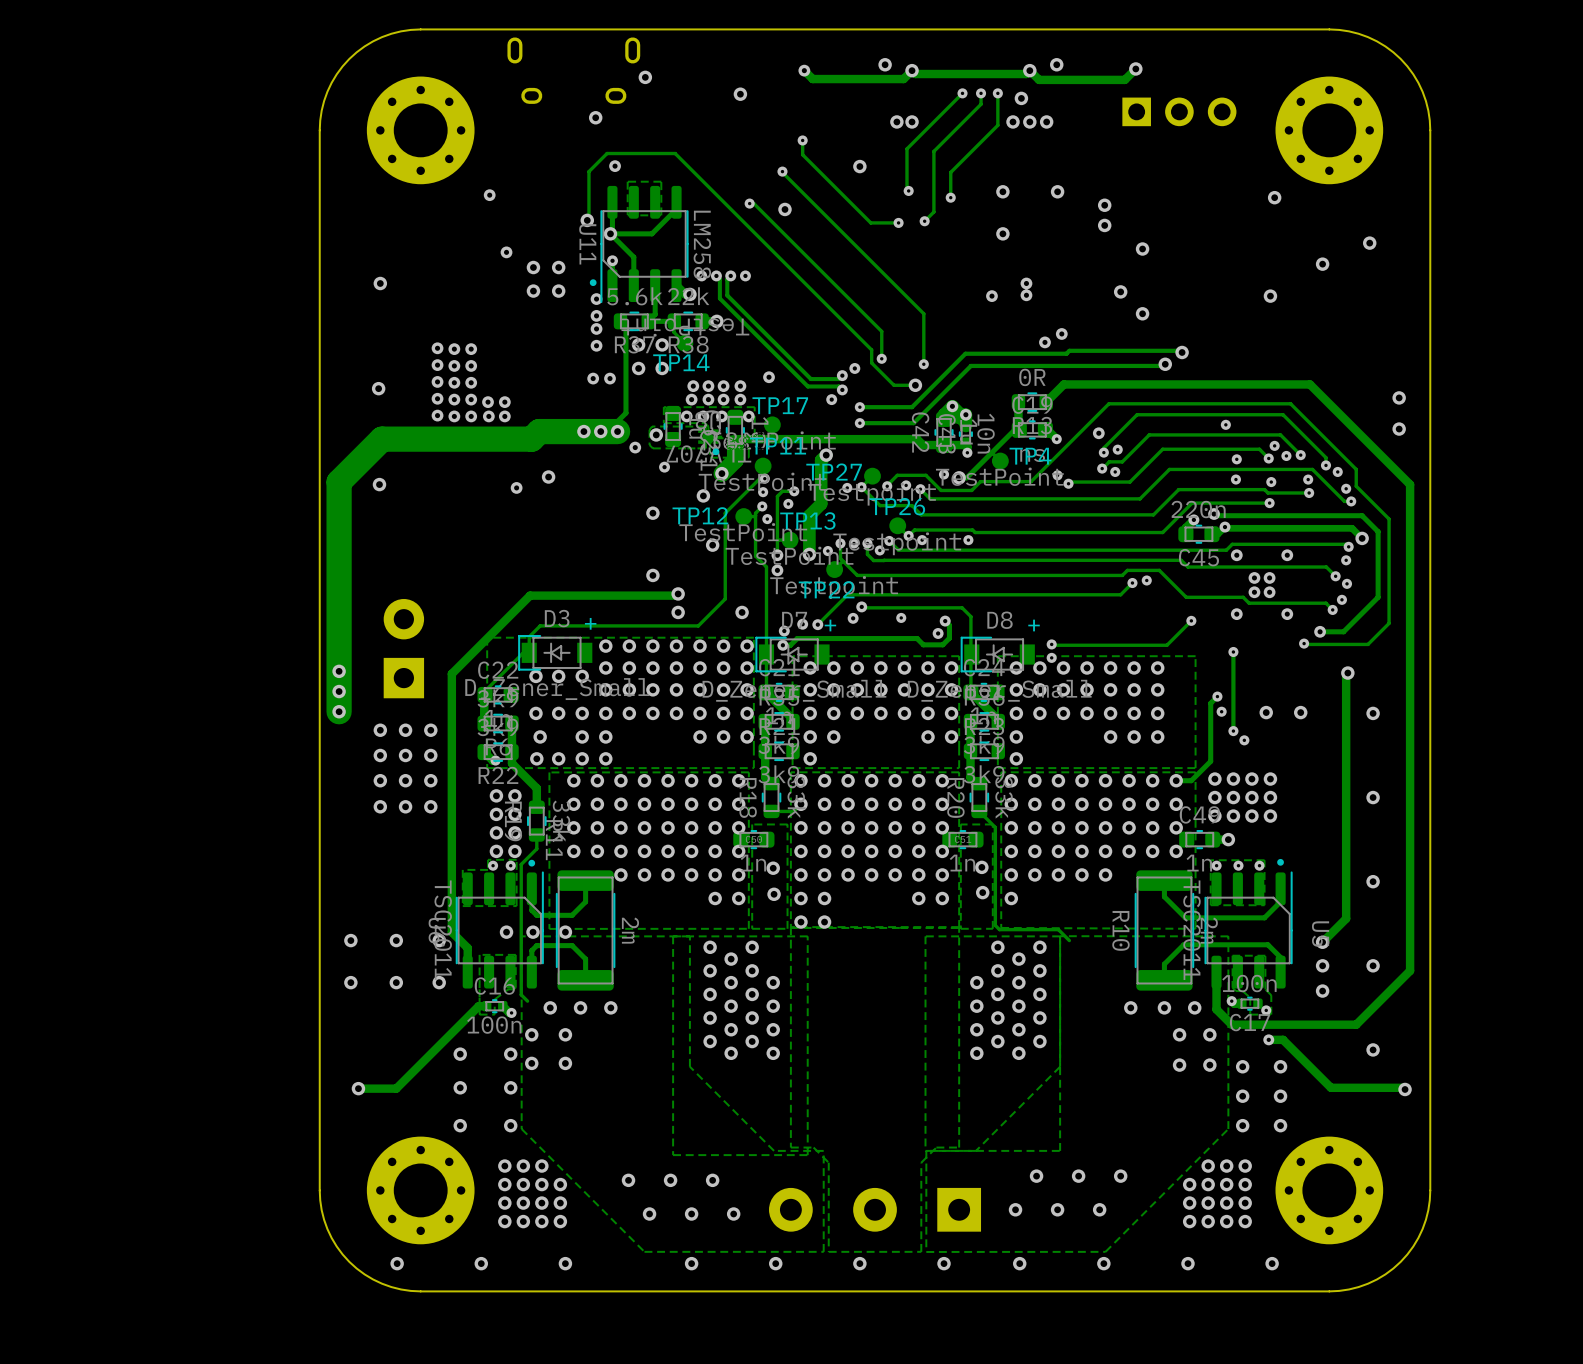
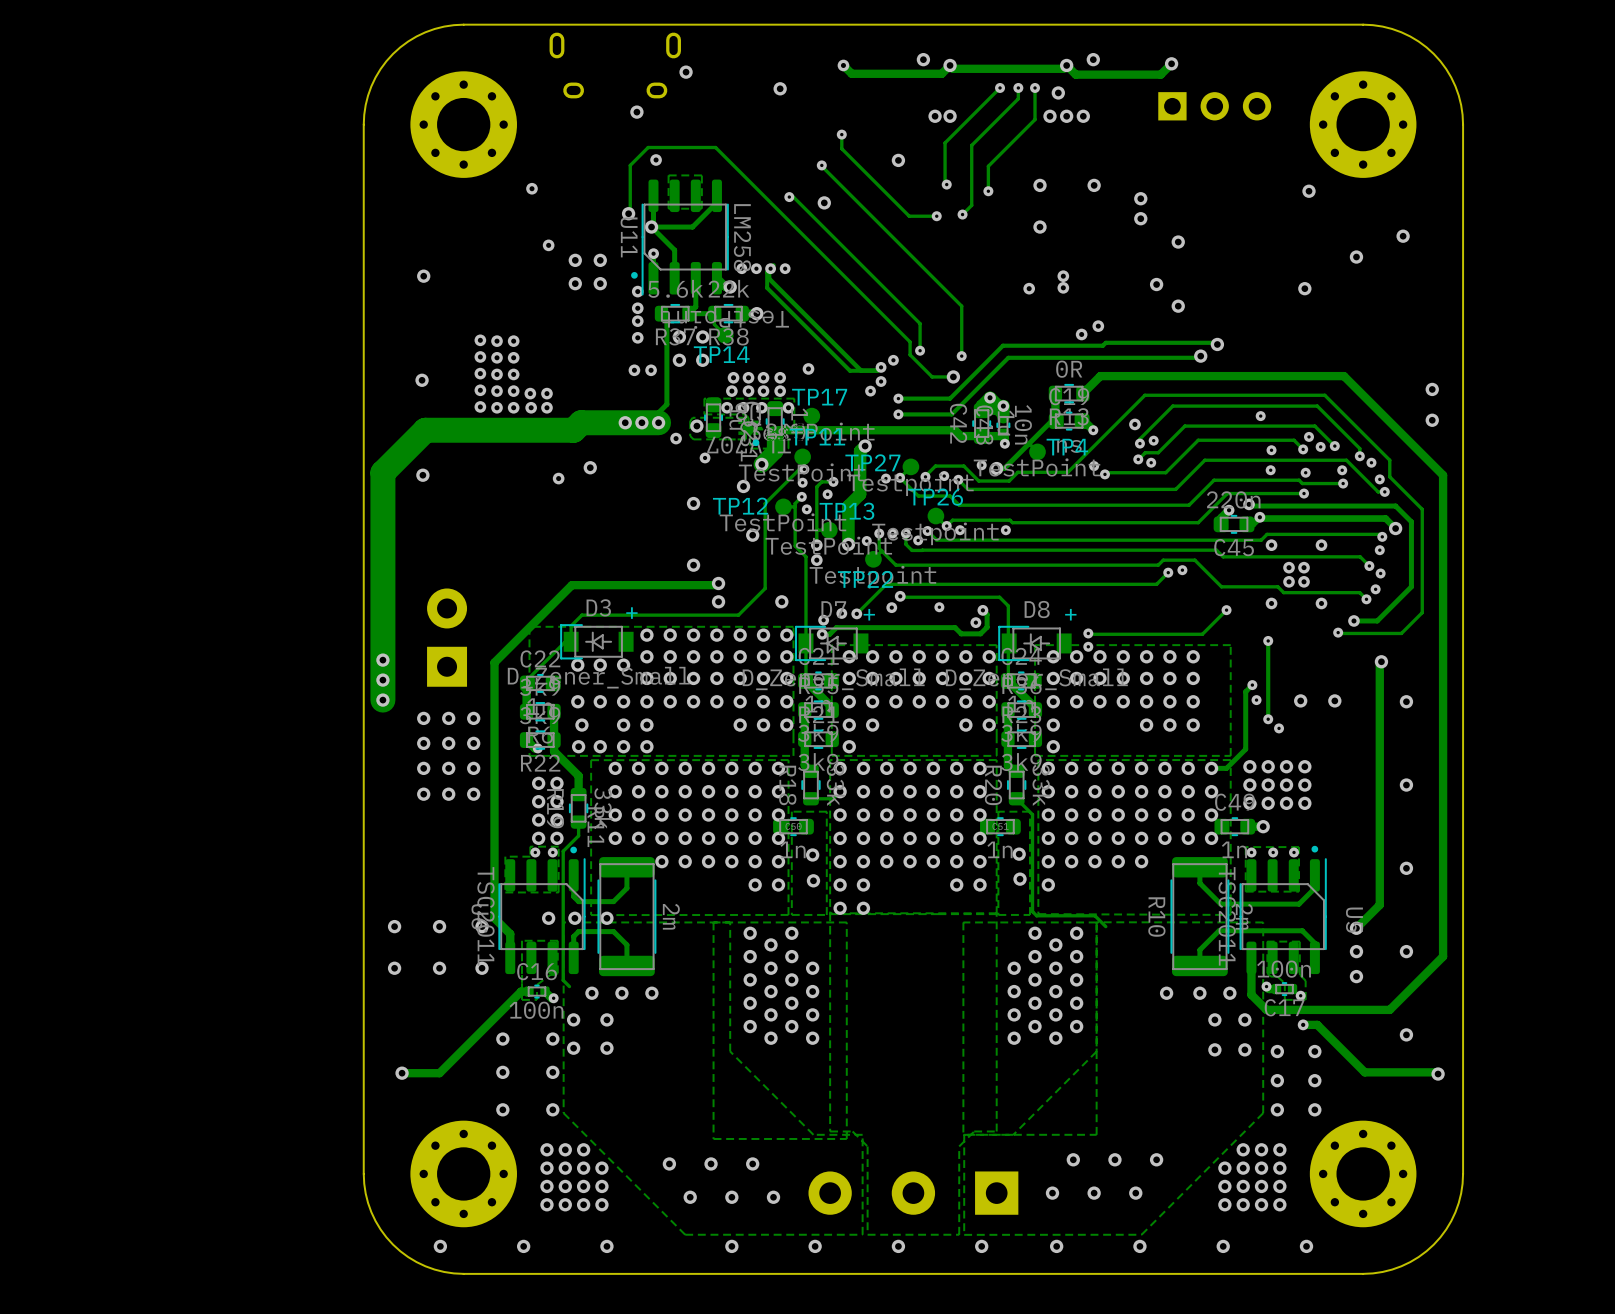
track: none -> (773, 265) (769, 269) (769, 278) (860, 370) (876, 370) (881, 366)
track: (716, 275) (719, 279) (719, 298) (807, 386) (838, 386) (842, 389) -> none

